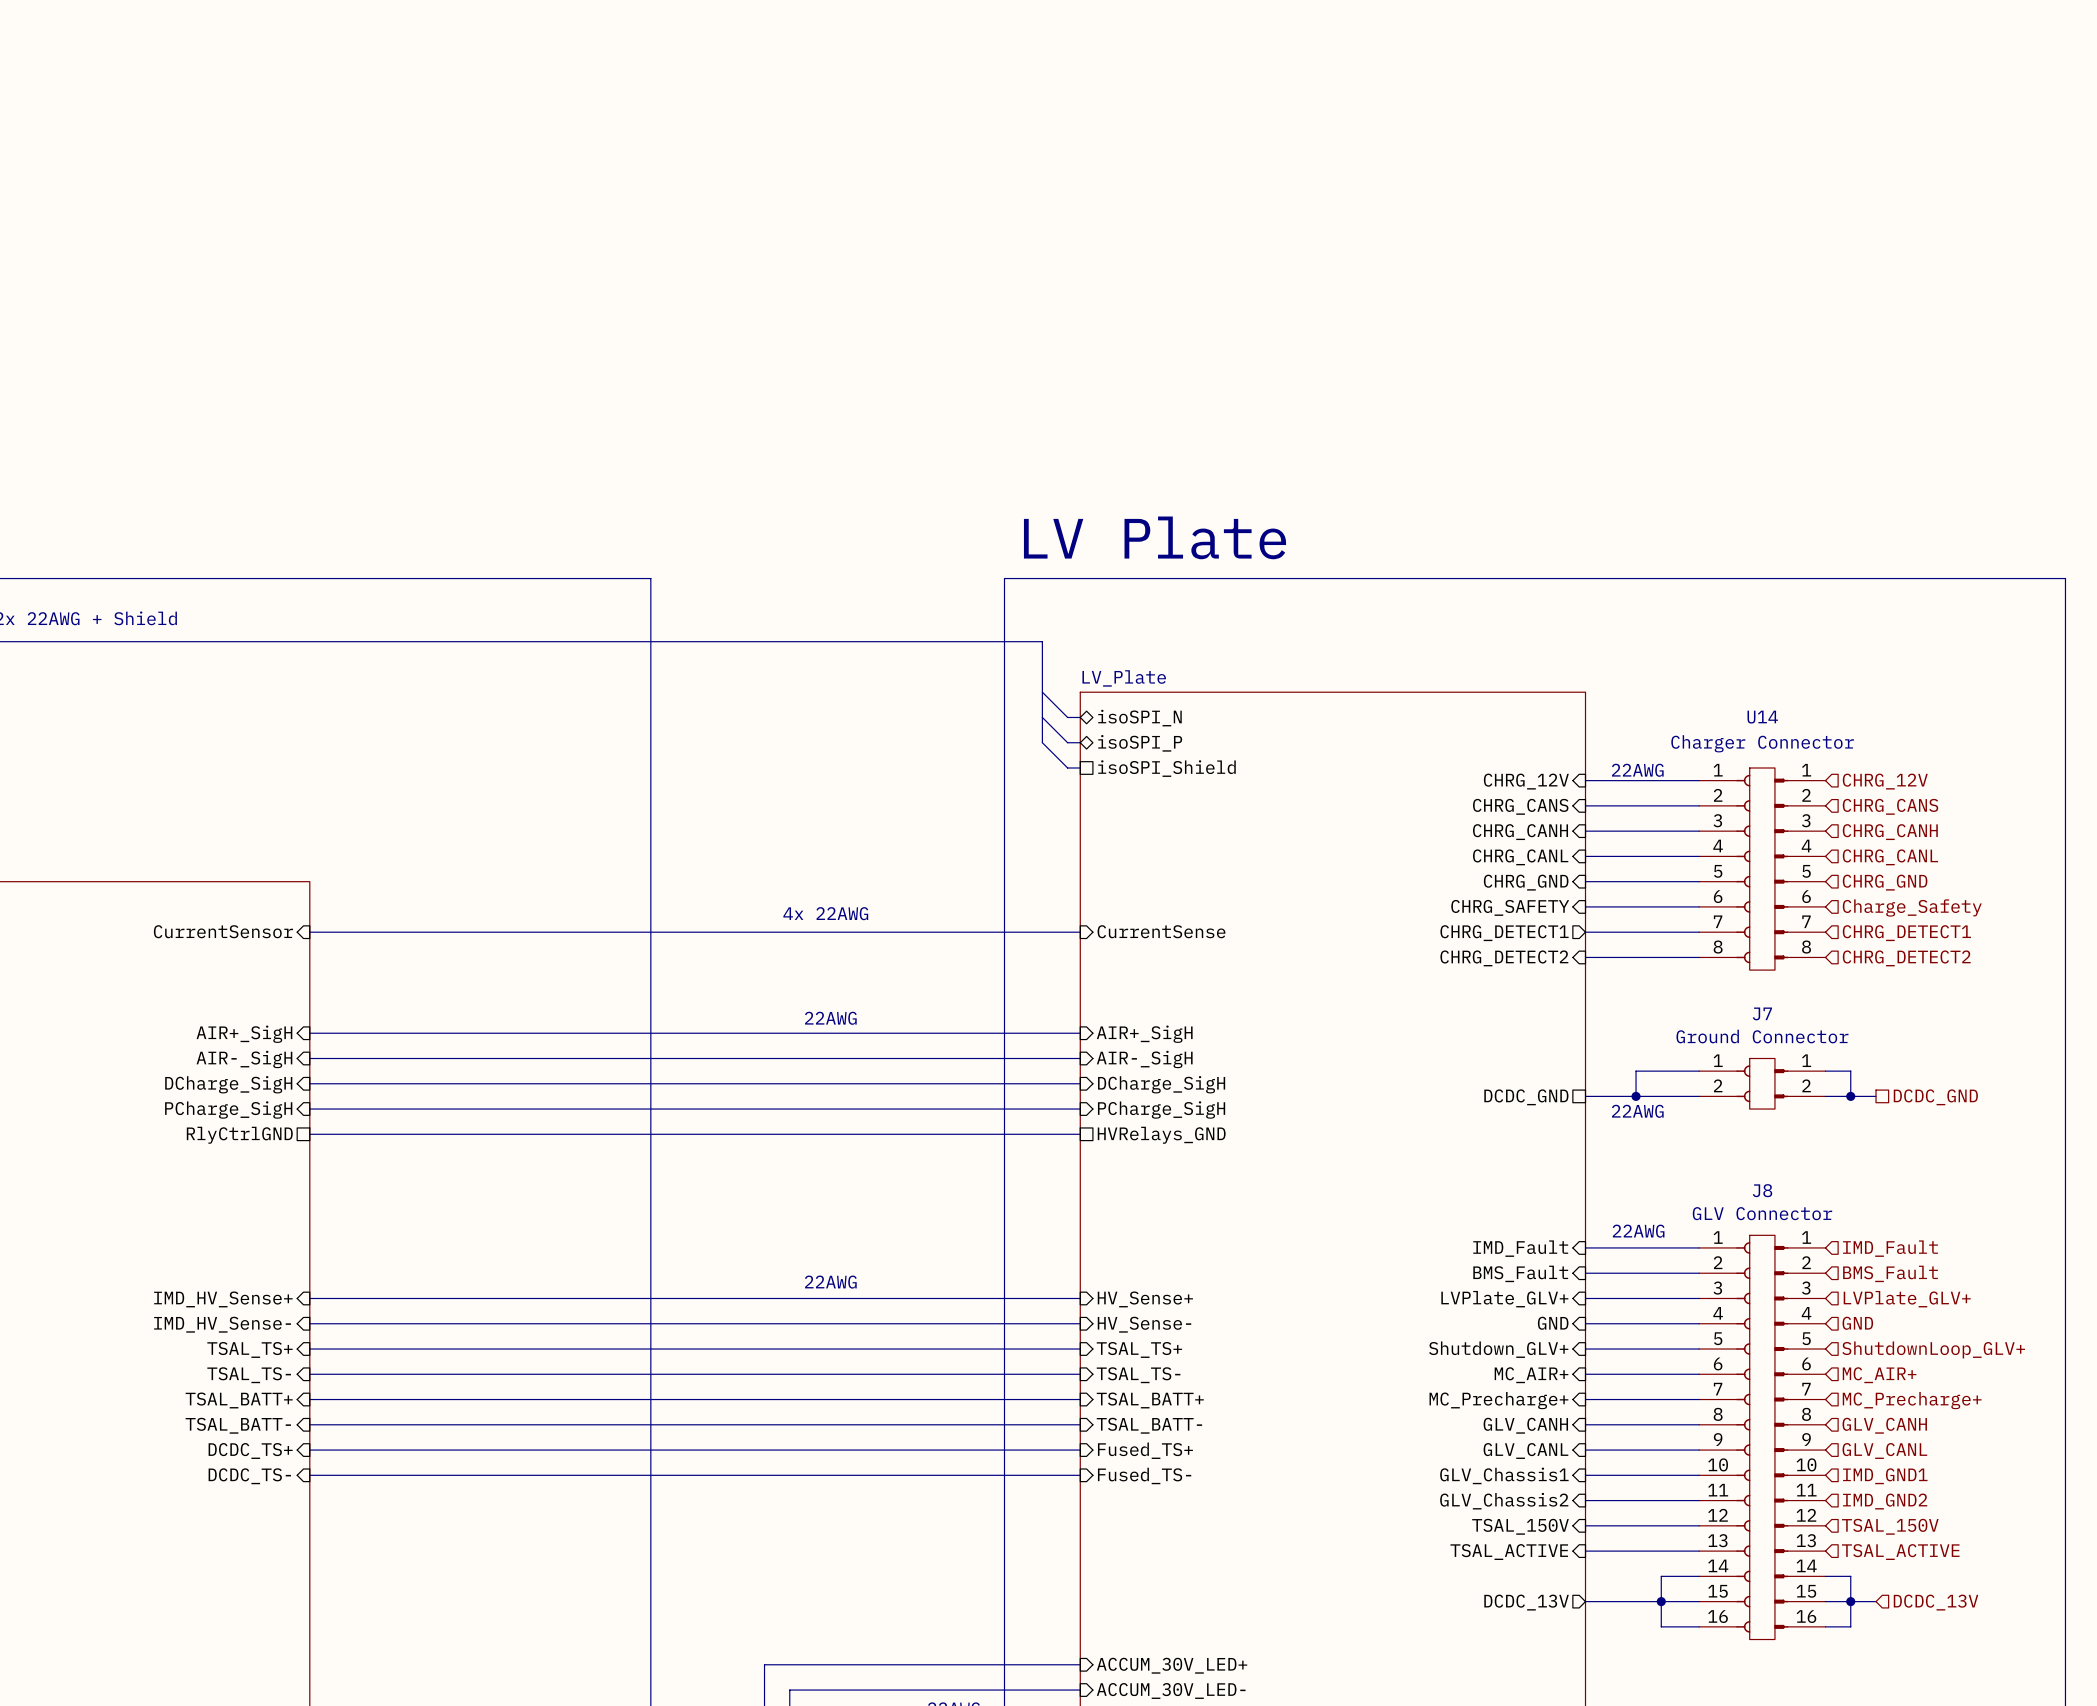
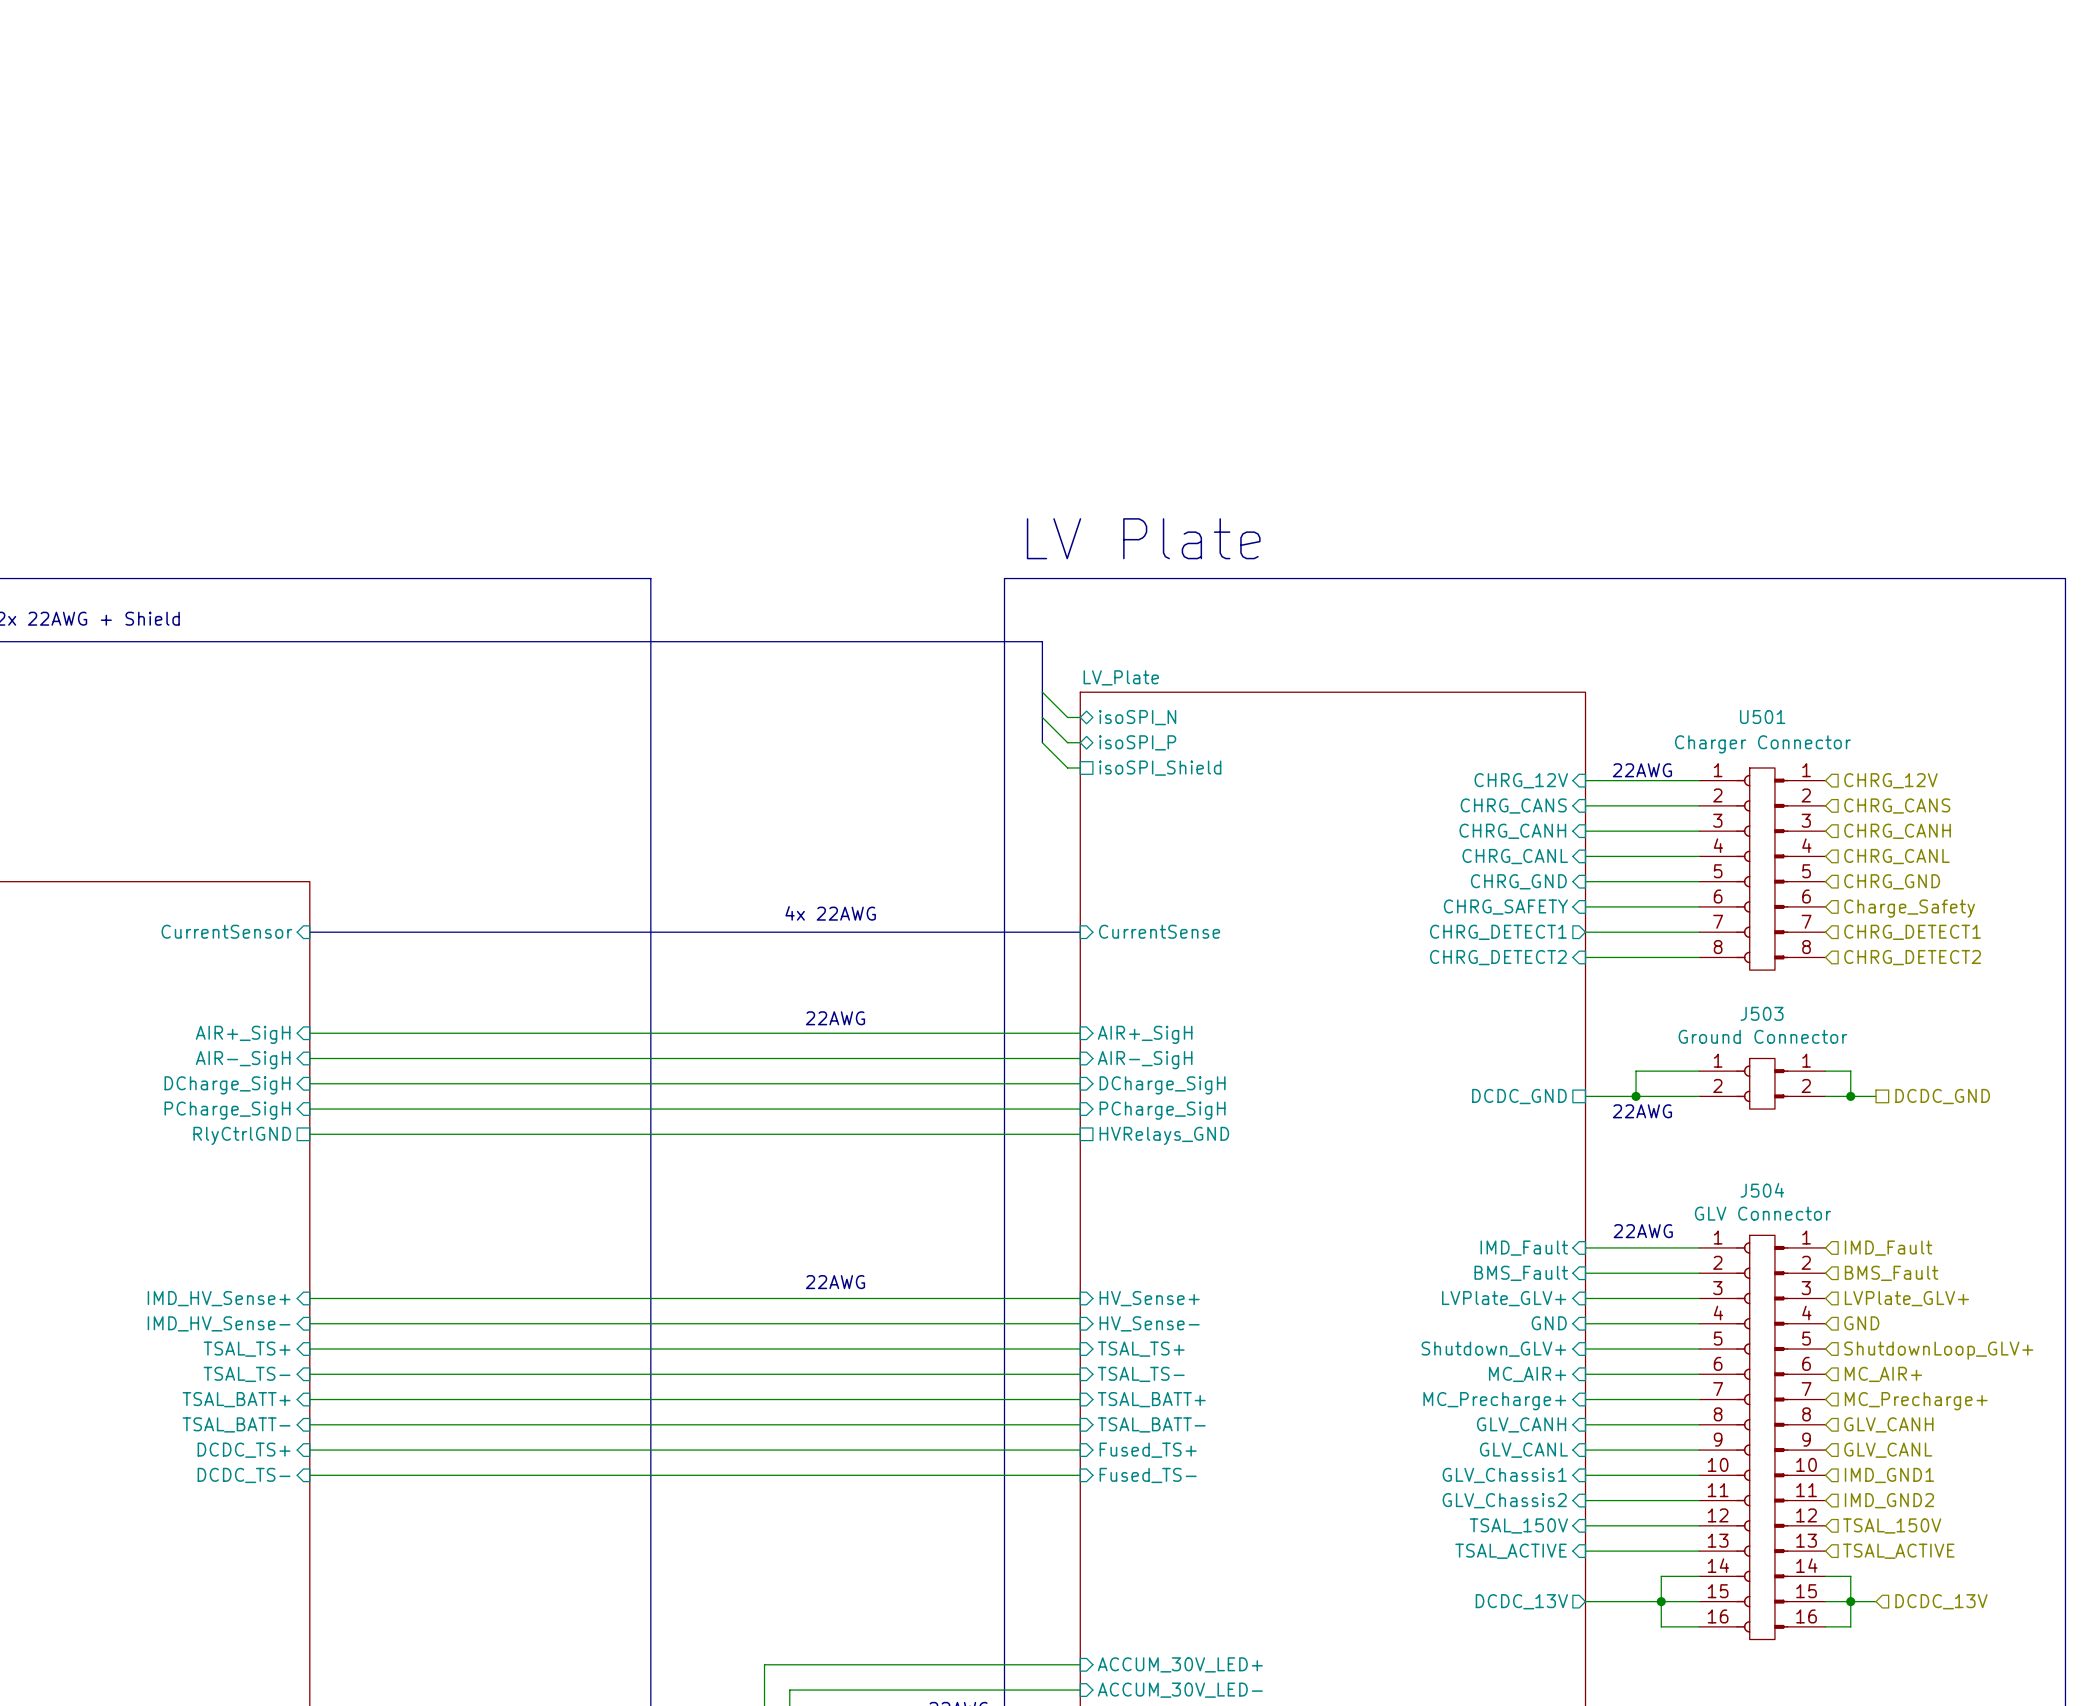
U14 name: U14 (1762, 717) -> U501 (1762, 717)
J7 name: J7 (1762, 1013) -> J503 (1762, 1013)
J8 name: J8 (1762, 1190) -> J504 (1762, 1190)

